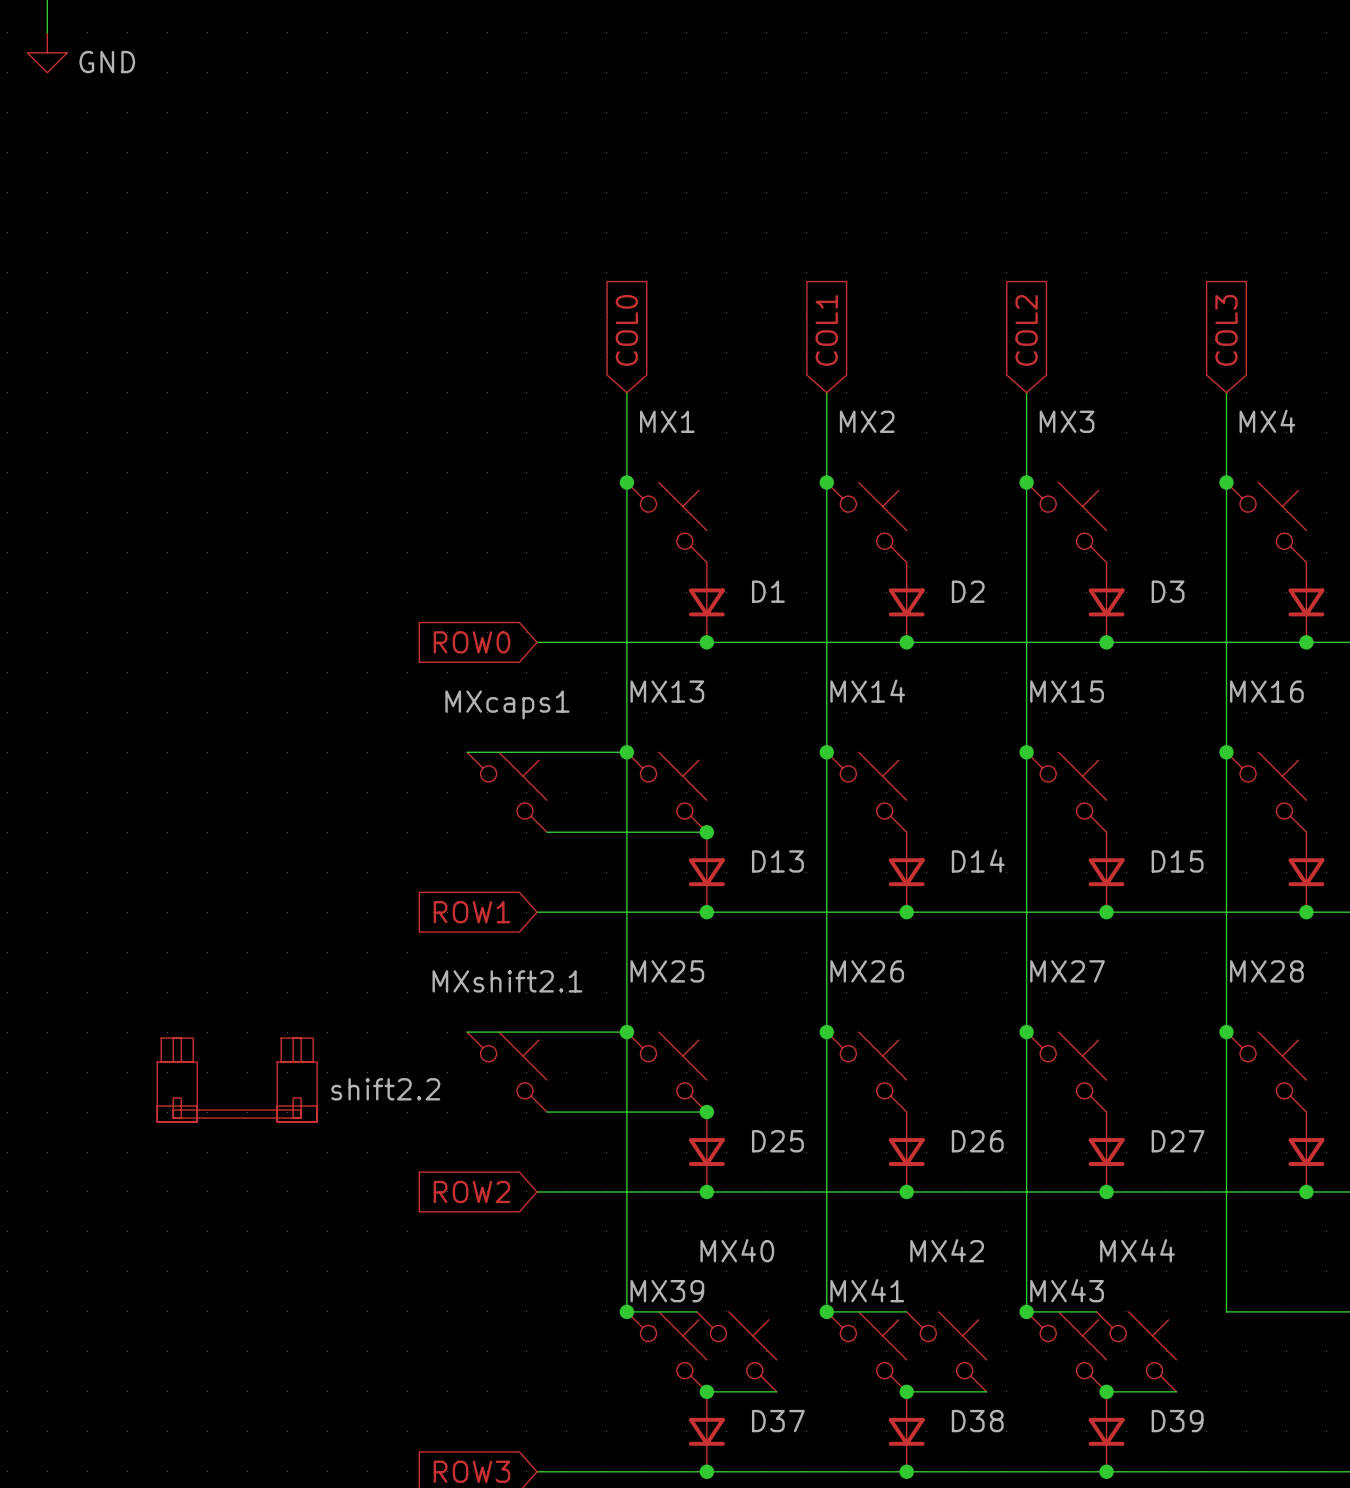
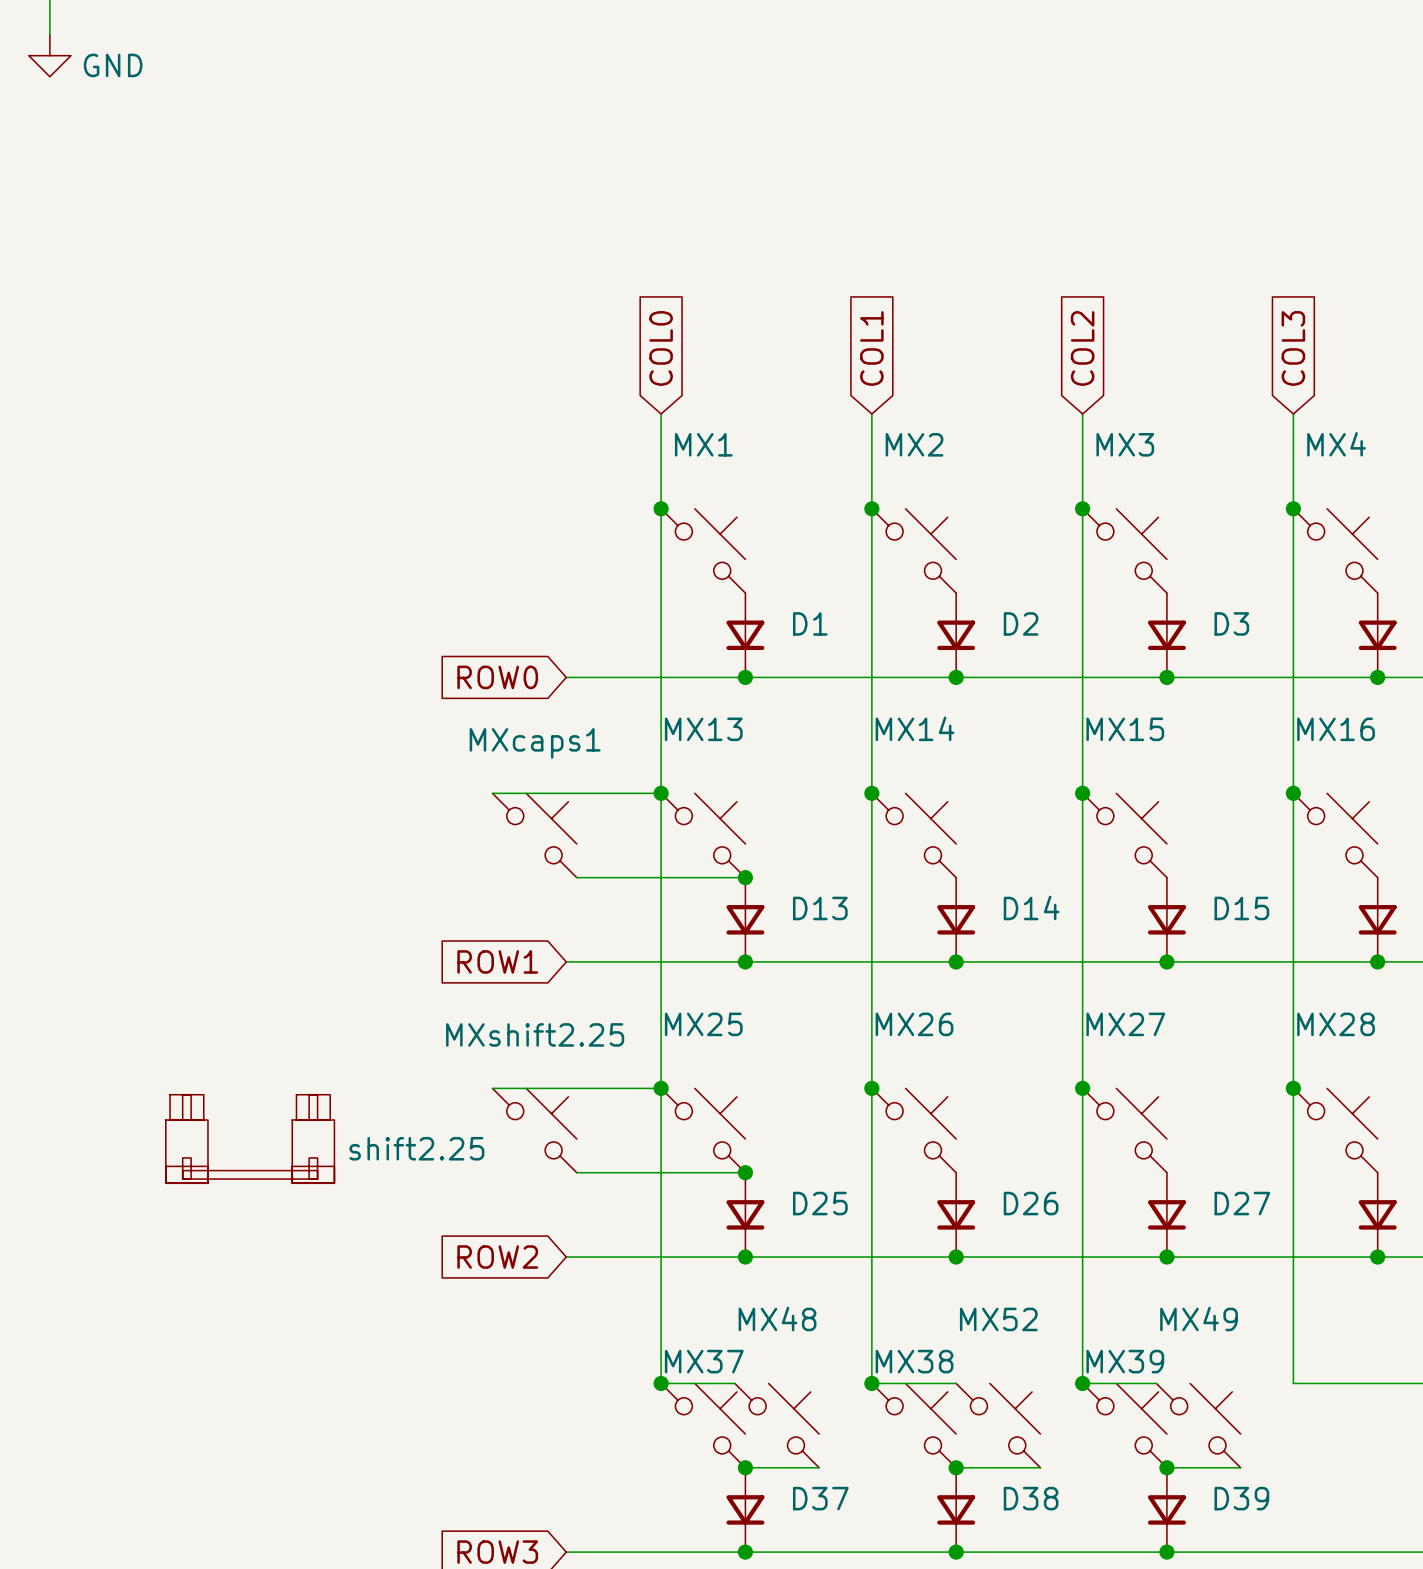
MXshift2.1 name: MXshift2.1 (507, 981) -> MXshift2.25 (535, 1034)
shift2.2 name: shift2.2 (385, 1089) -> shift2.25 (416, 1148)
MX40 name: MX40 (737, 1250) -> MX48 (777, 1318)
MX42 name: MX42 (947, 1250) -> MX52 (998, 1319)
MX44 name: MX44 (1137, 1250) -> MX49 (1199, 1318)
MX41 name: MX41 (867, 1290) -> MX38 (914, 1361)
MX43 name: MX43 (1067, 1290) -> MX39 (1125, 1361)
MX39 name: MX39 (667, 1291) -> MX37 (704, 1361)

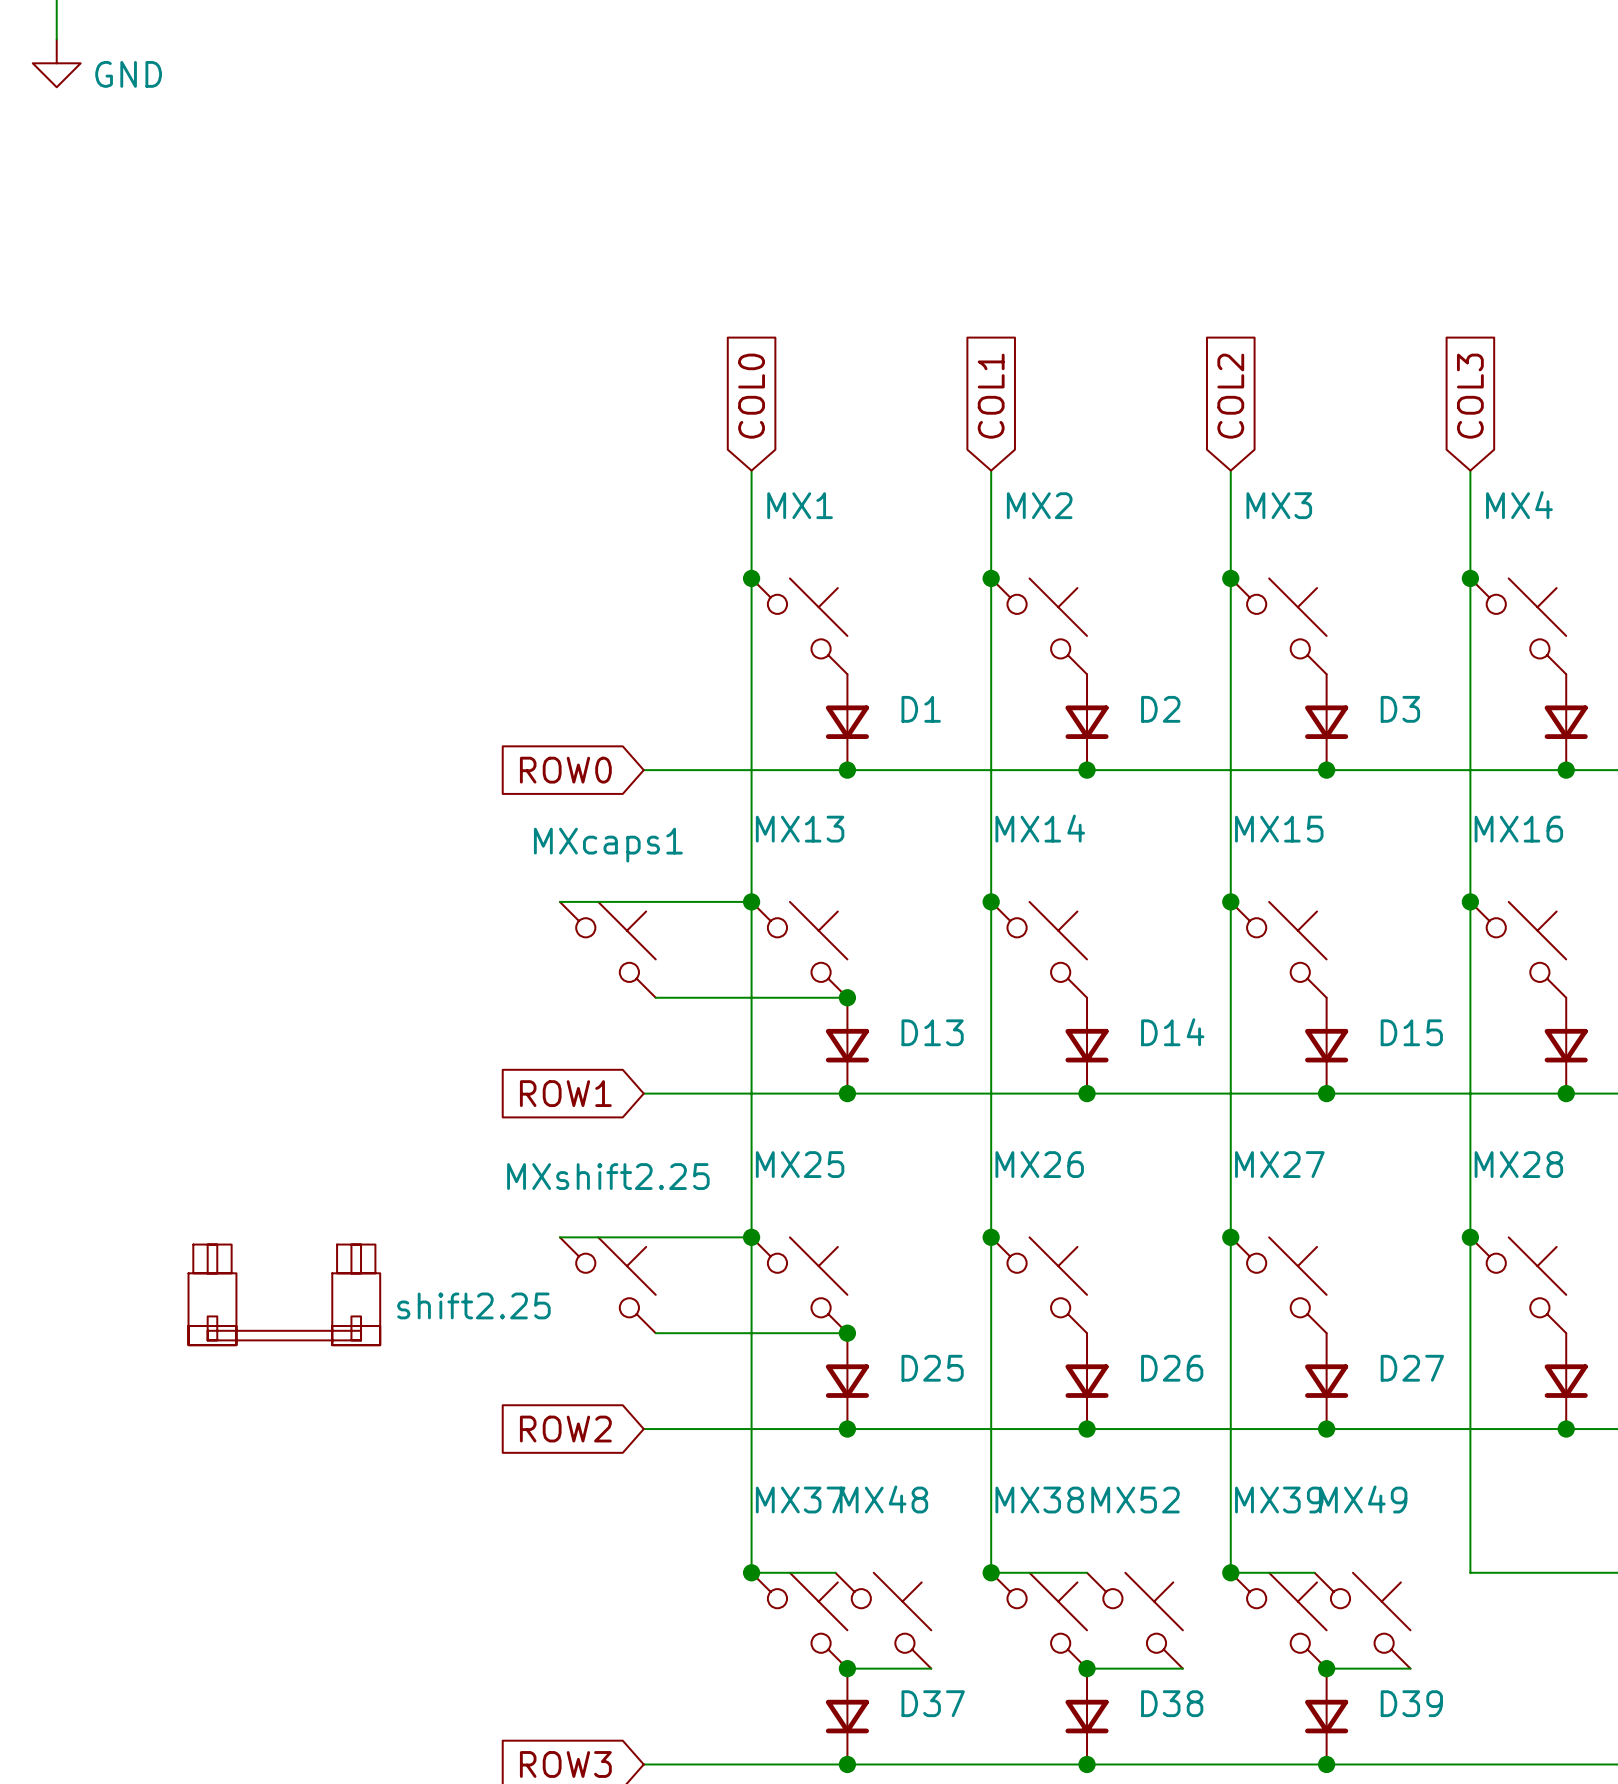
MX37 name position: MX37 (704, 1361) -> MX37 (800, 1500)
MX38 name position: MX38 (914, 1361) -> MX38 (1039, 1500)
MX39 name position: MX39 (1125, 1361) -> MX39 (1279, 1500)

